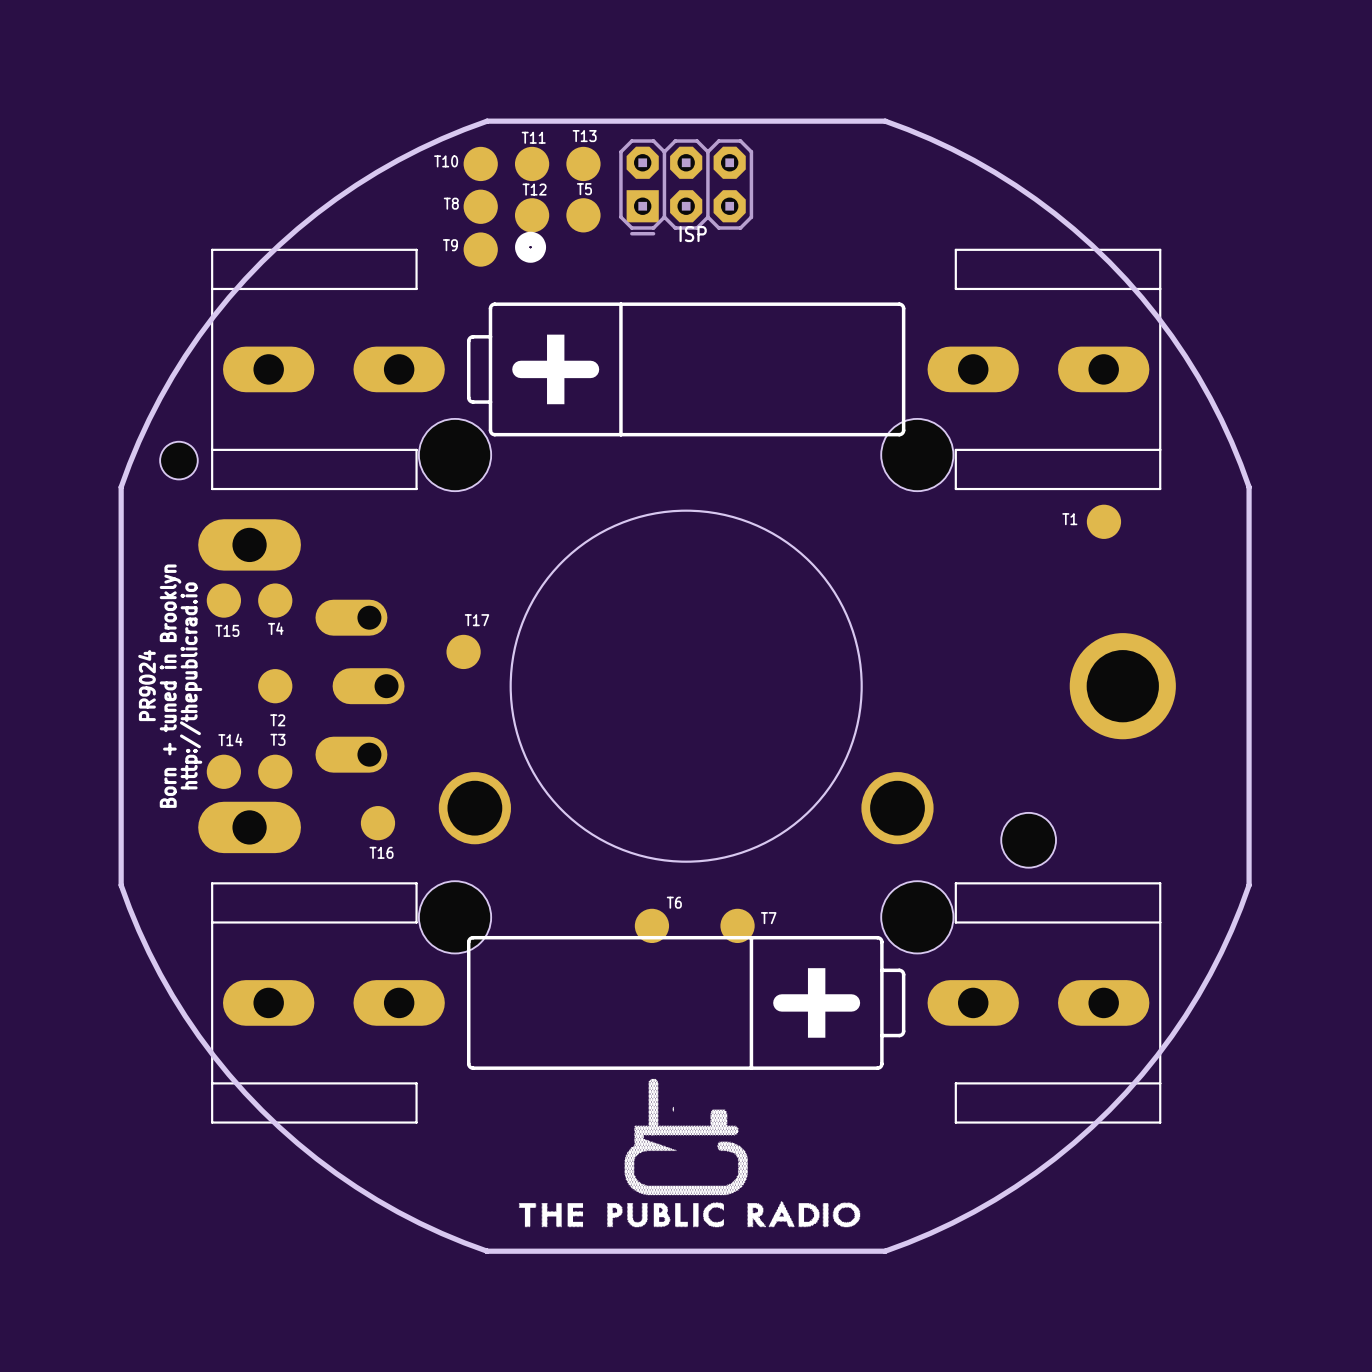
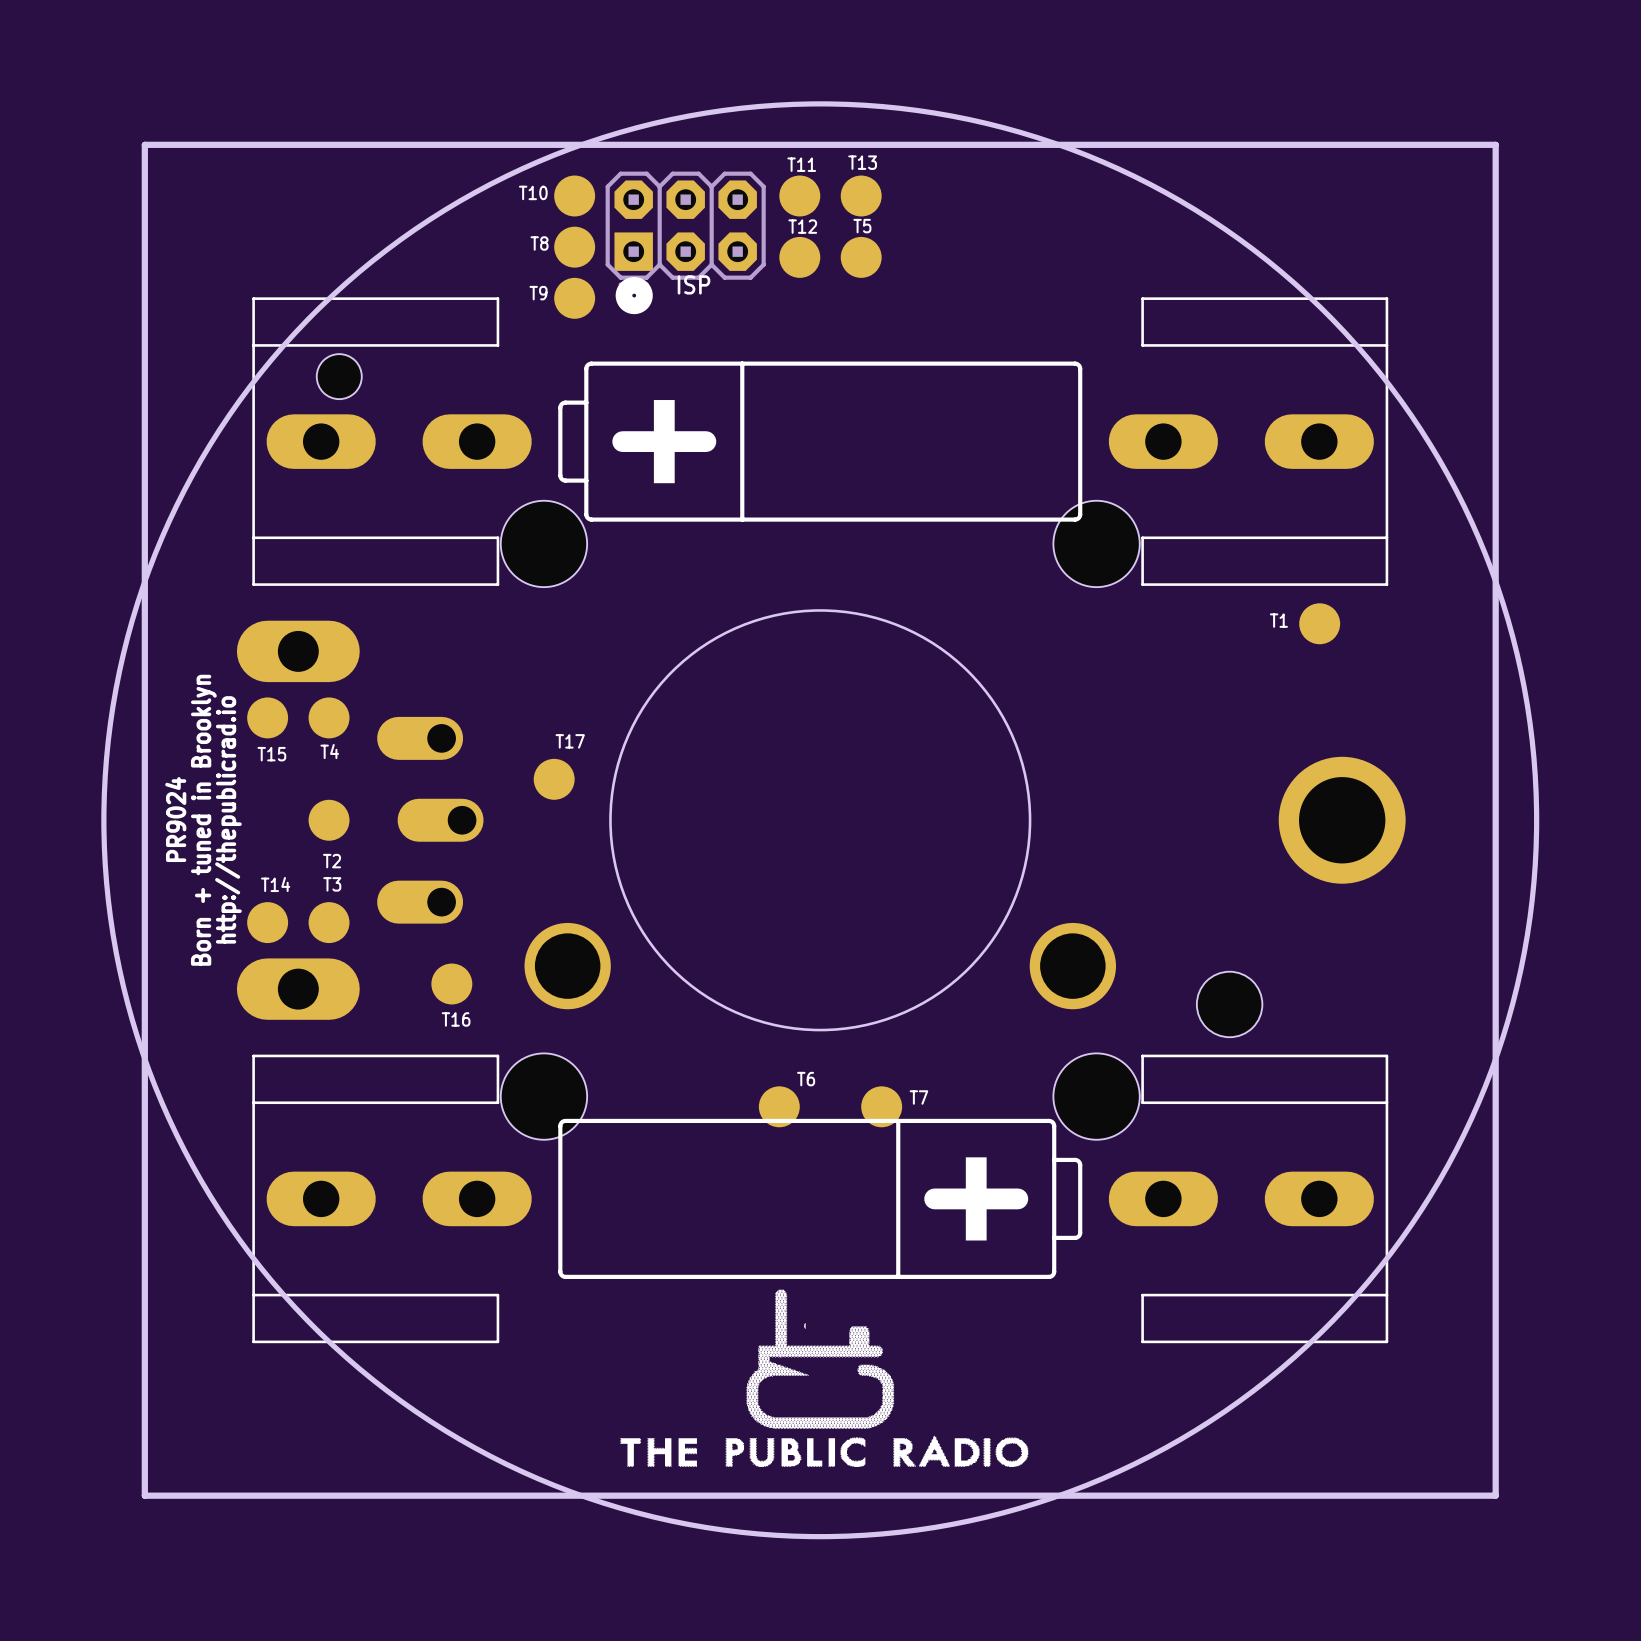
round board edge: none -> [101, 101, 1540, 1540]
board edge: (487, 121) (441, 138) (376, 172) (316, 213) (261, 261) (213, 316) (172, 376) (138, 441) (121, 487) -> (582, 144) (144, 144) (144, 582)
board edge: (885, 121) (930, 138) (995, 172) (1054, 213) (1109, 262) (1157, 316) (1185, 356) (1221, 419) (1249, 487) (1249, 885) (1221, 952) (1185, 1015) (1157, 1055) (1126, 1092) (1073, 1143) (1035, 1173) (995, 1199) (930, 1233) (885, 1251) -> (1058, 144) (1495, 144) (1495, 1495) (1058, 1495)
T11 position: (532, 163) -> (799, 196)
T13 position: (583, 163) -> (861, 196)
ISP position: (686, 187) -> (685, 229)
T12 position: (532, 215) -> (799, 257)
T5 position: (583, 215) -> (861, 257)
part position: (178, 460) -> (339, 376)
board edge: (121, 885) (138, 930) (172, 995) (213, 1055) (261, 1110) (316, 1158) (376, 1200) (441, 1233) (487, 1251) -> (144, 1058) (144, 1495) (581, 1495)

